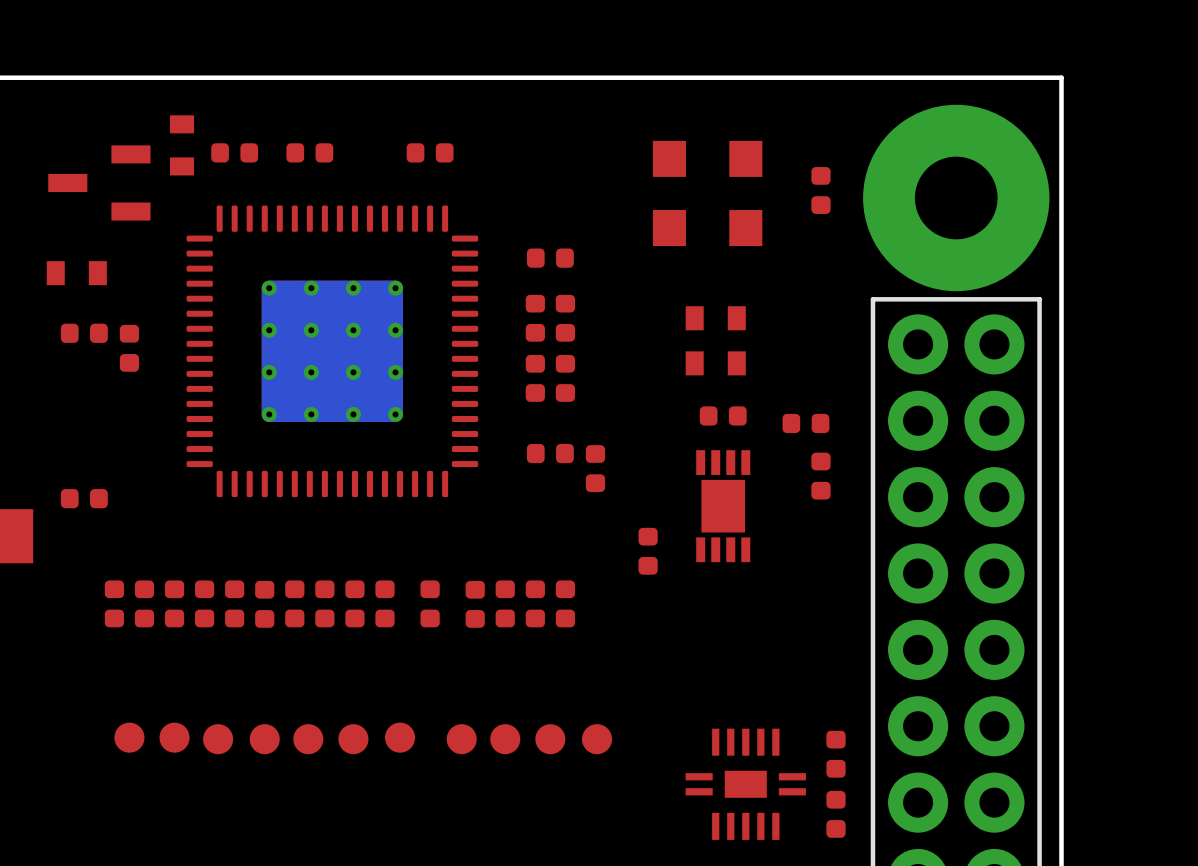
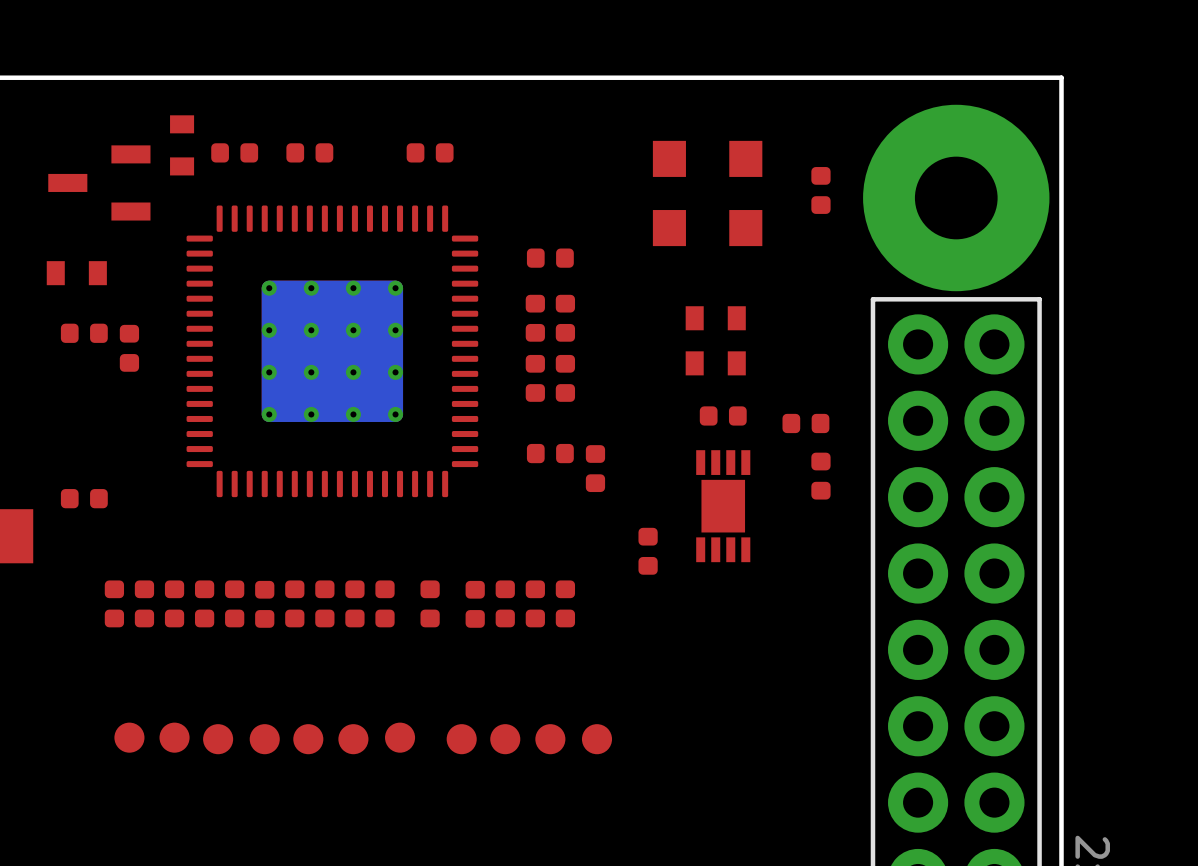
part: (836, 754) -> none
part: (745, 784) -> none
part: (836, 814) -> none

